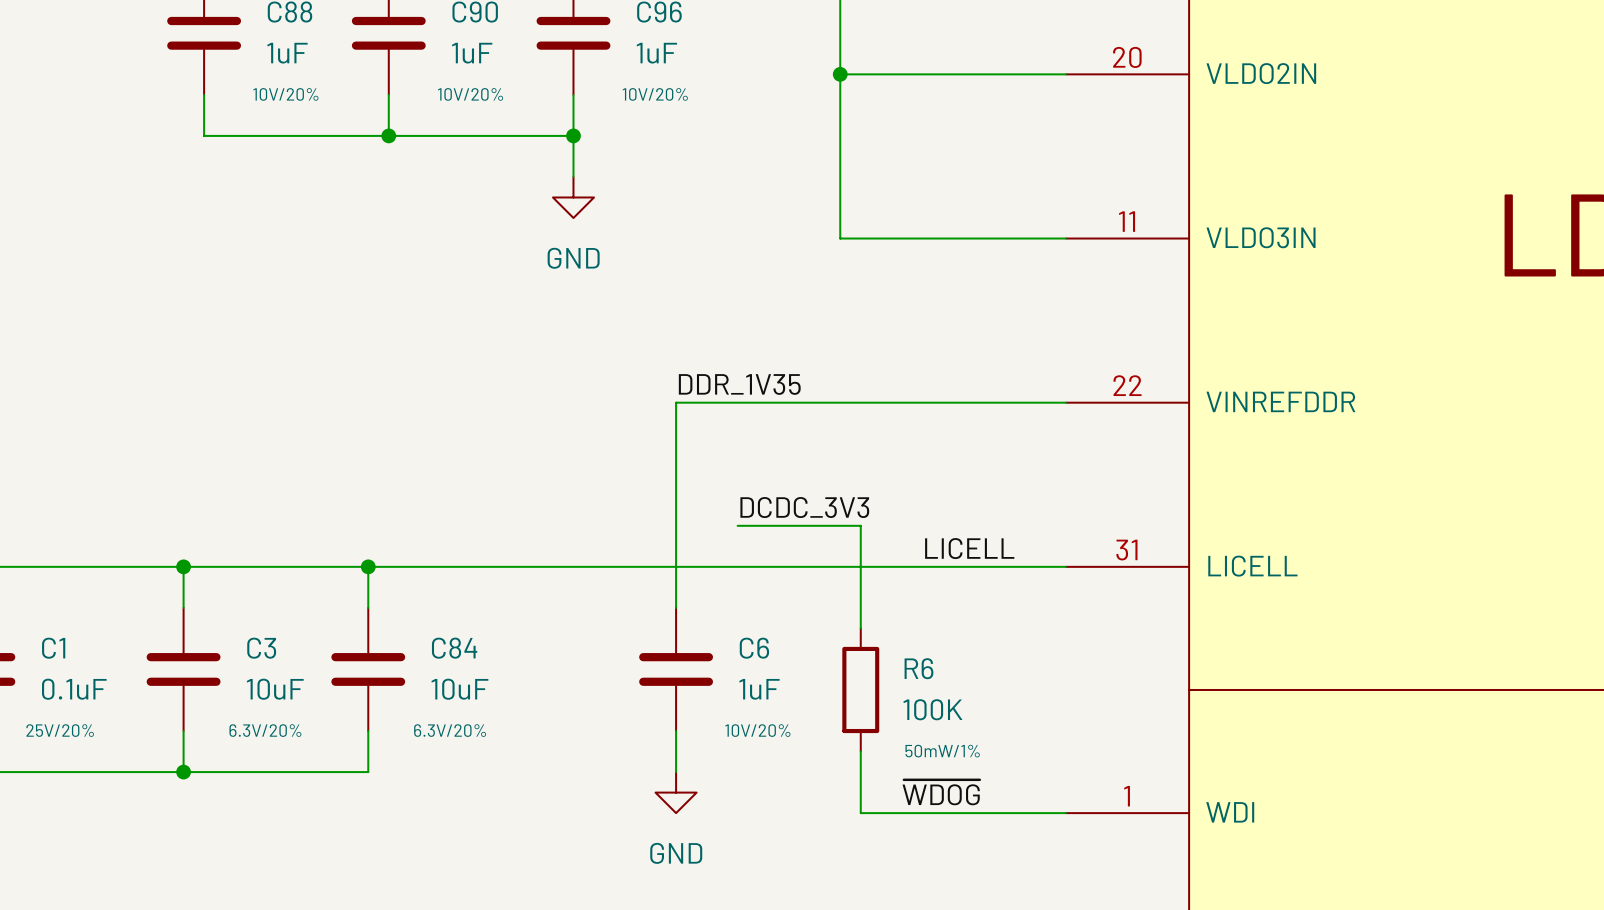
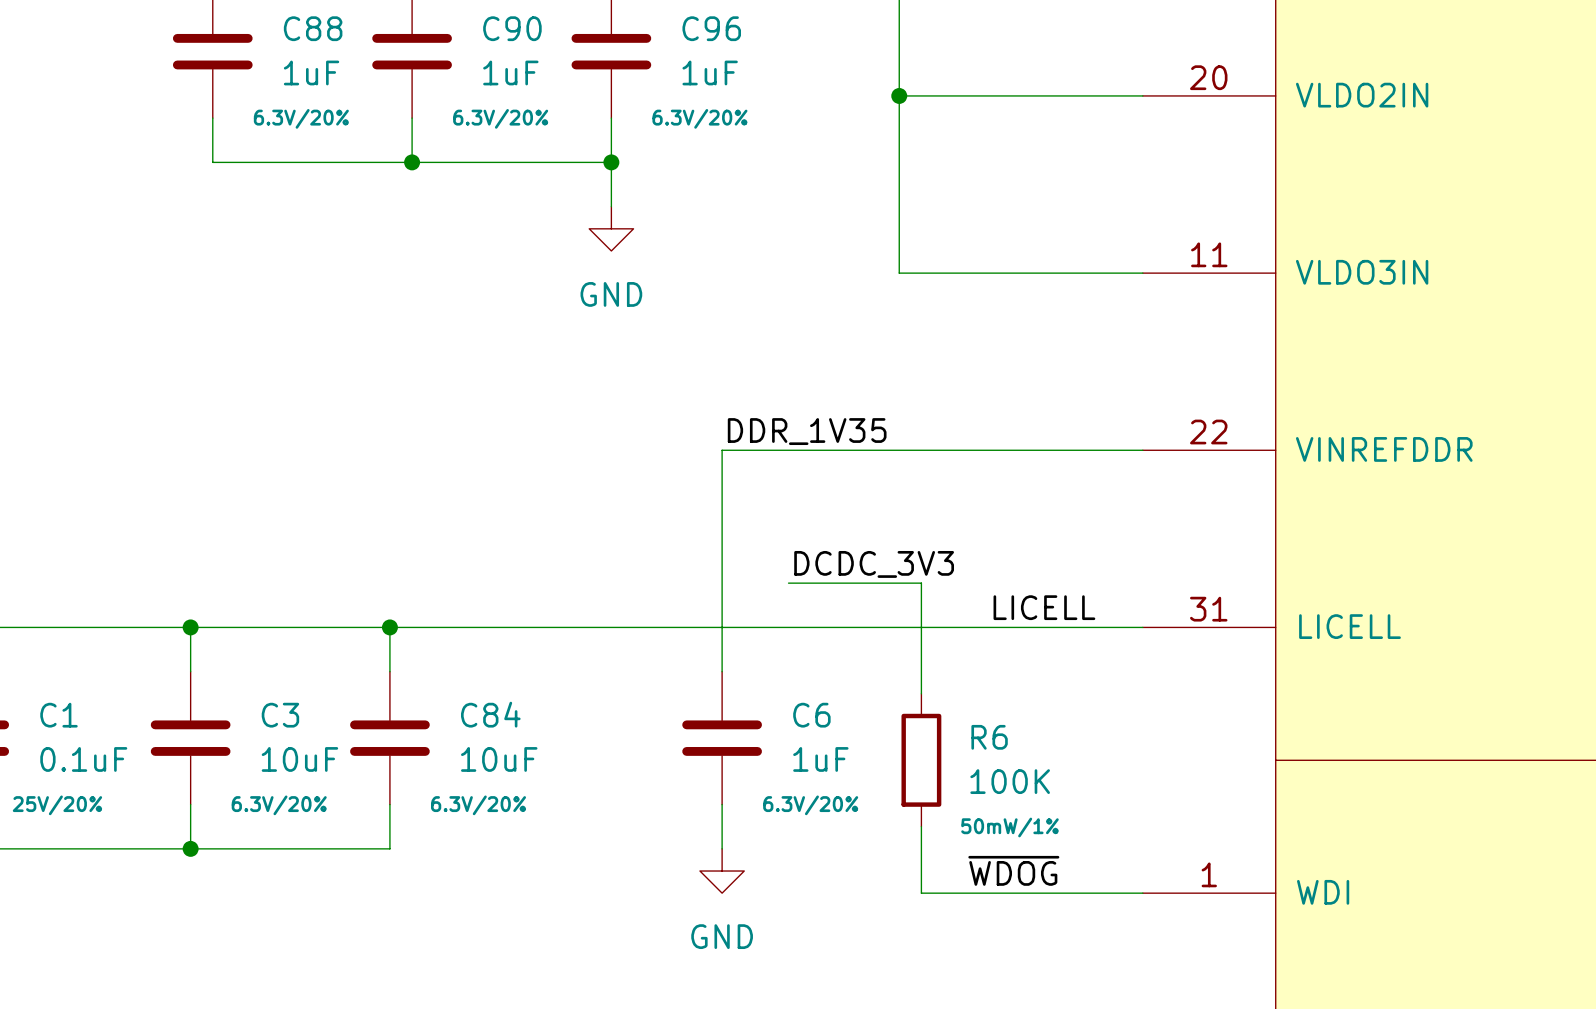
C88 text: 10V/20% (285, 94) -> 6.3V/20% (301, 118)
C90 text: 10V/20% (470, 94) -> 6.3V/20% (500, 118)
C96 text: 10V/20% (655, 94) -> 6.3V/20% (699, 118)
C6 text: 10V/20% (757, 730) -> 6.3V/20% (810, 805)

